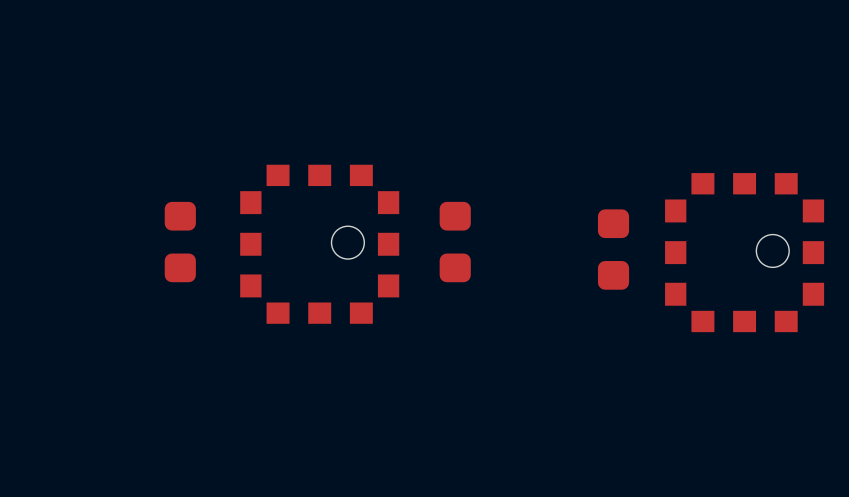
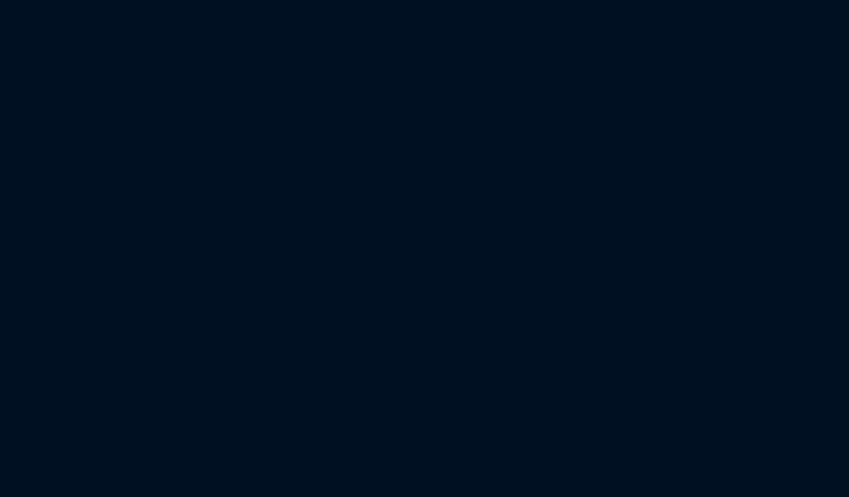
part: (180, 242) -> none
part: (455, 242) -> none
part: (319, 244) -> none
part: (613, 249) -> none
part: (744, 252) -> none

